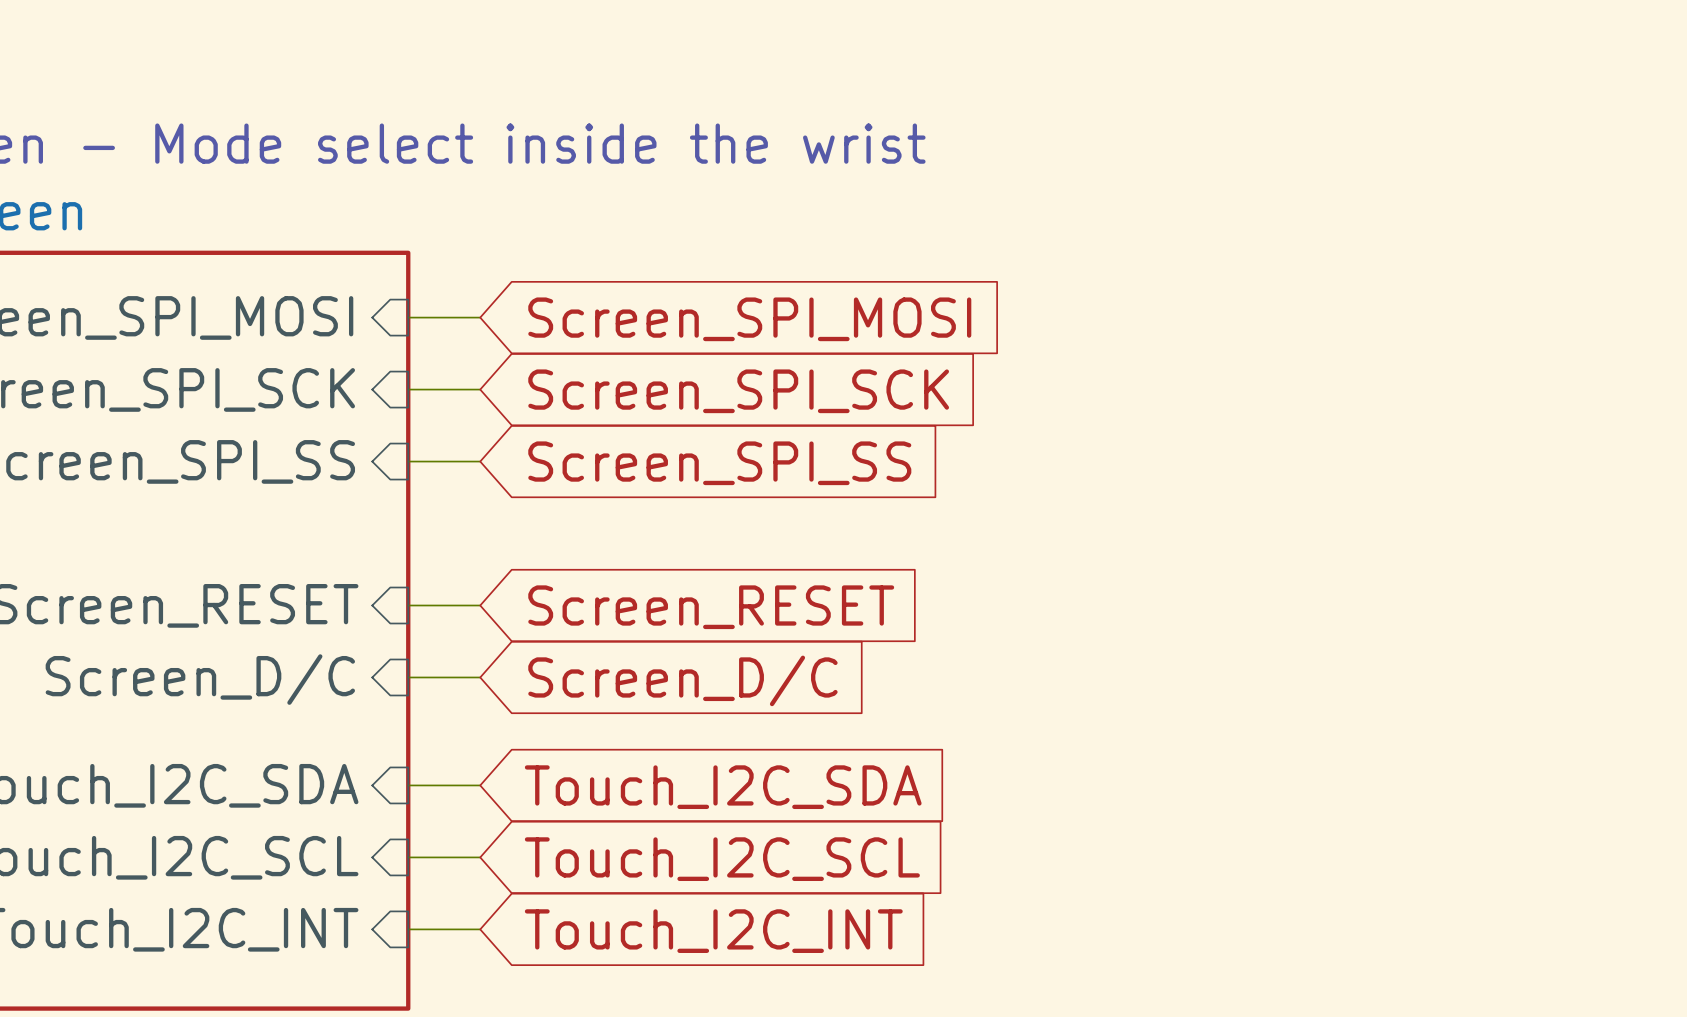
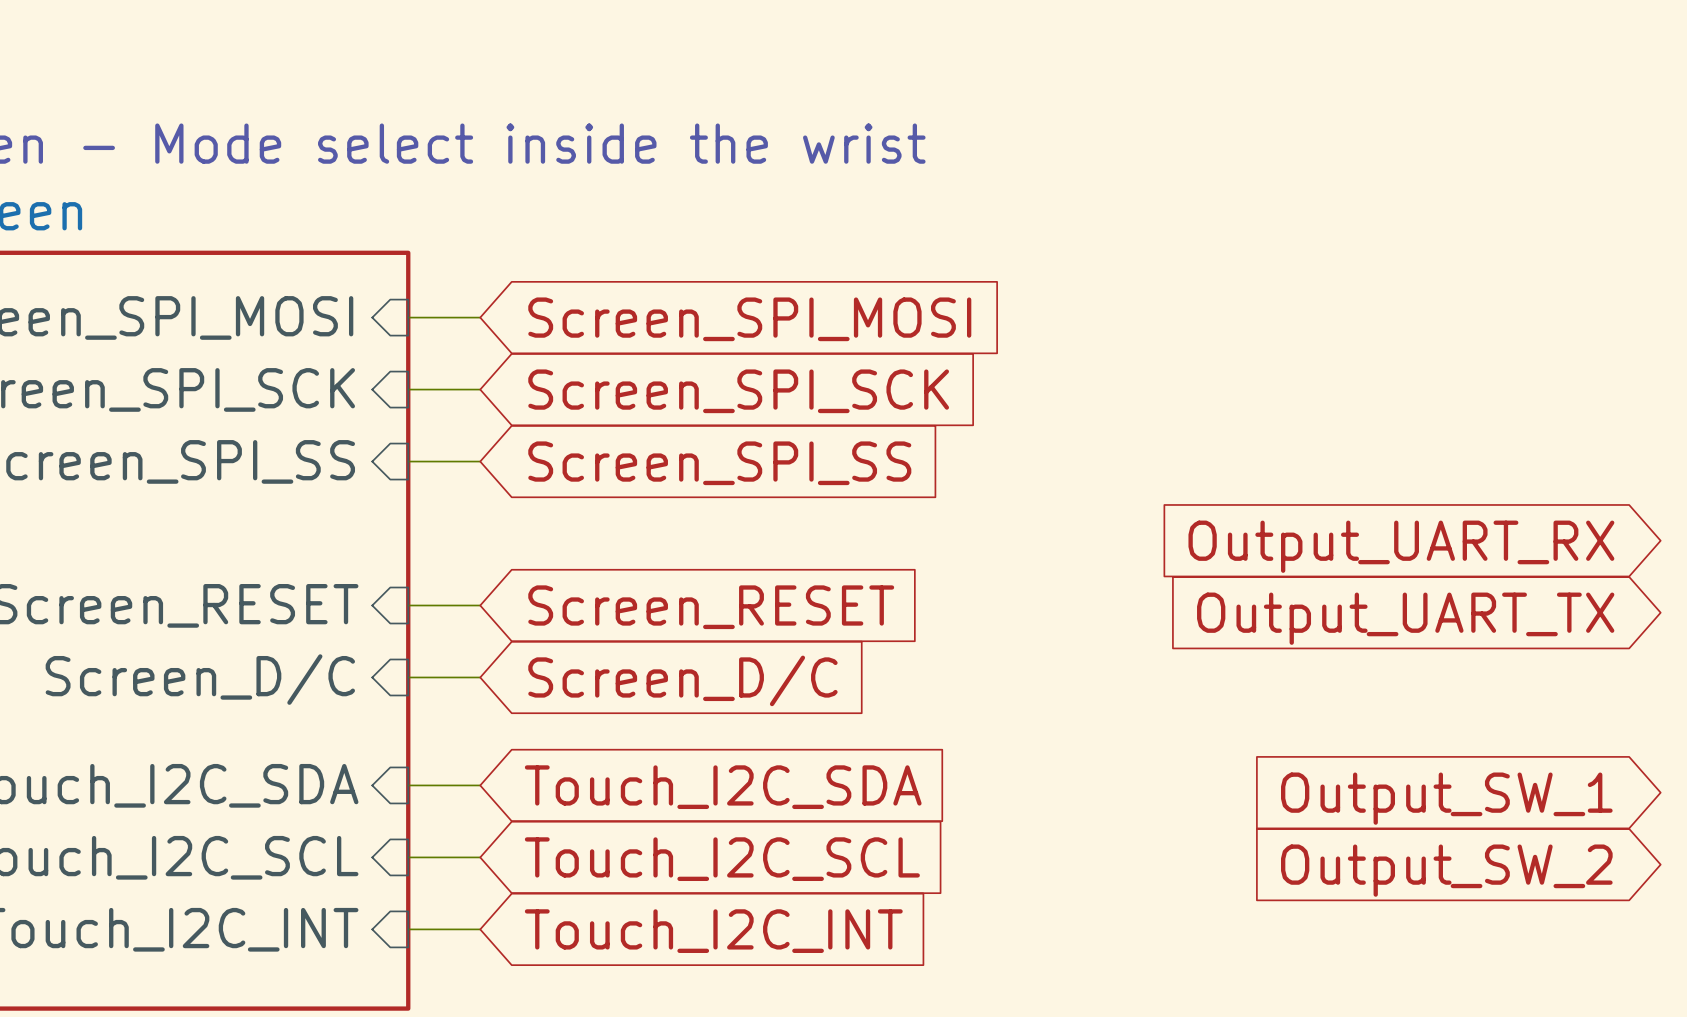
global label: none -> Output_UART_RX (1401, 546)
global label: none -> Output_UART_TX (1405, 618)
global label: none -> Output_SW_1 (1446, 798)
global label: none -> Output_SW_2 (1446, 870)

